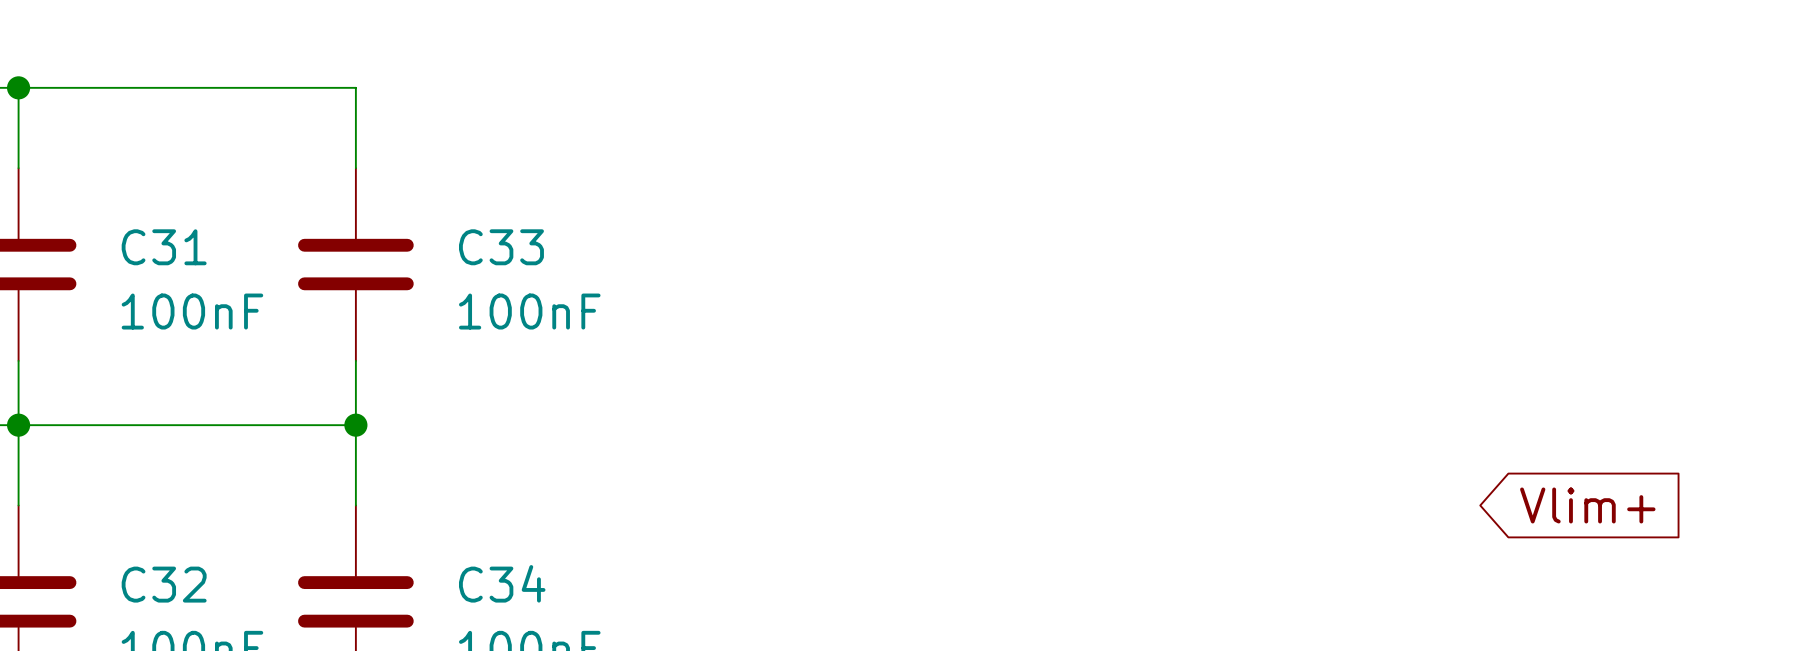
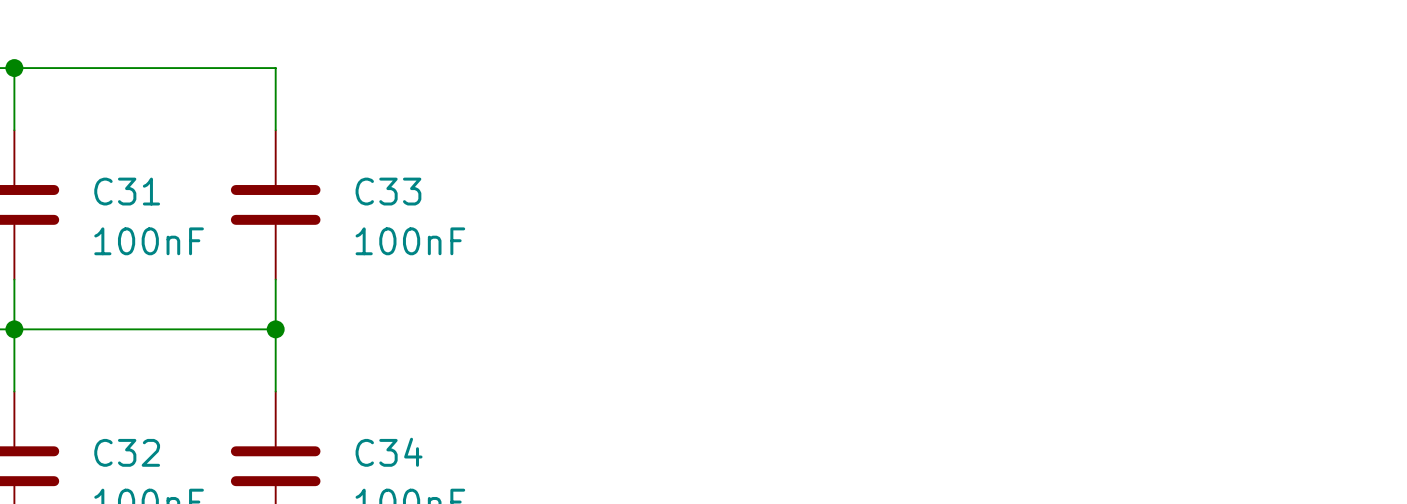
global label: Vlim+ (1587, 505) -> none

